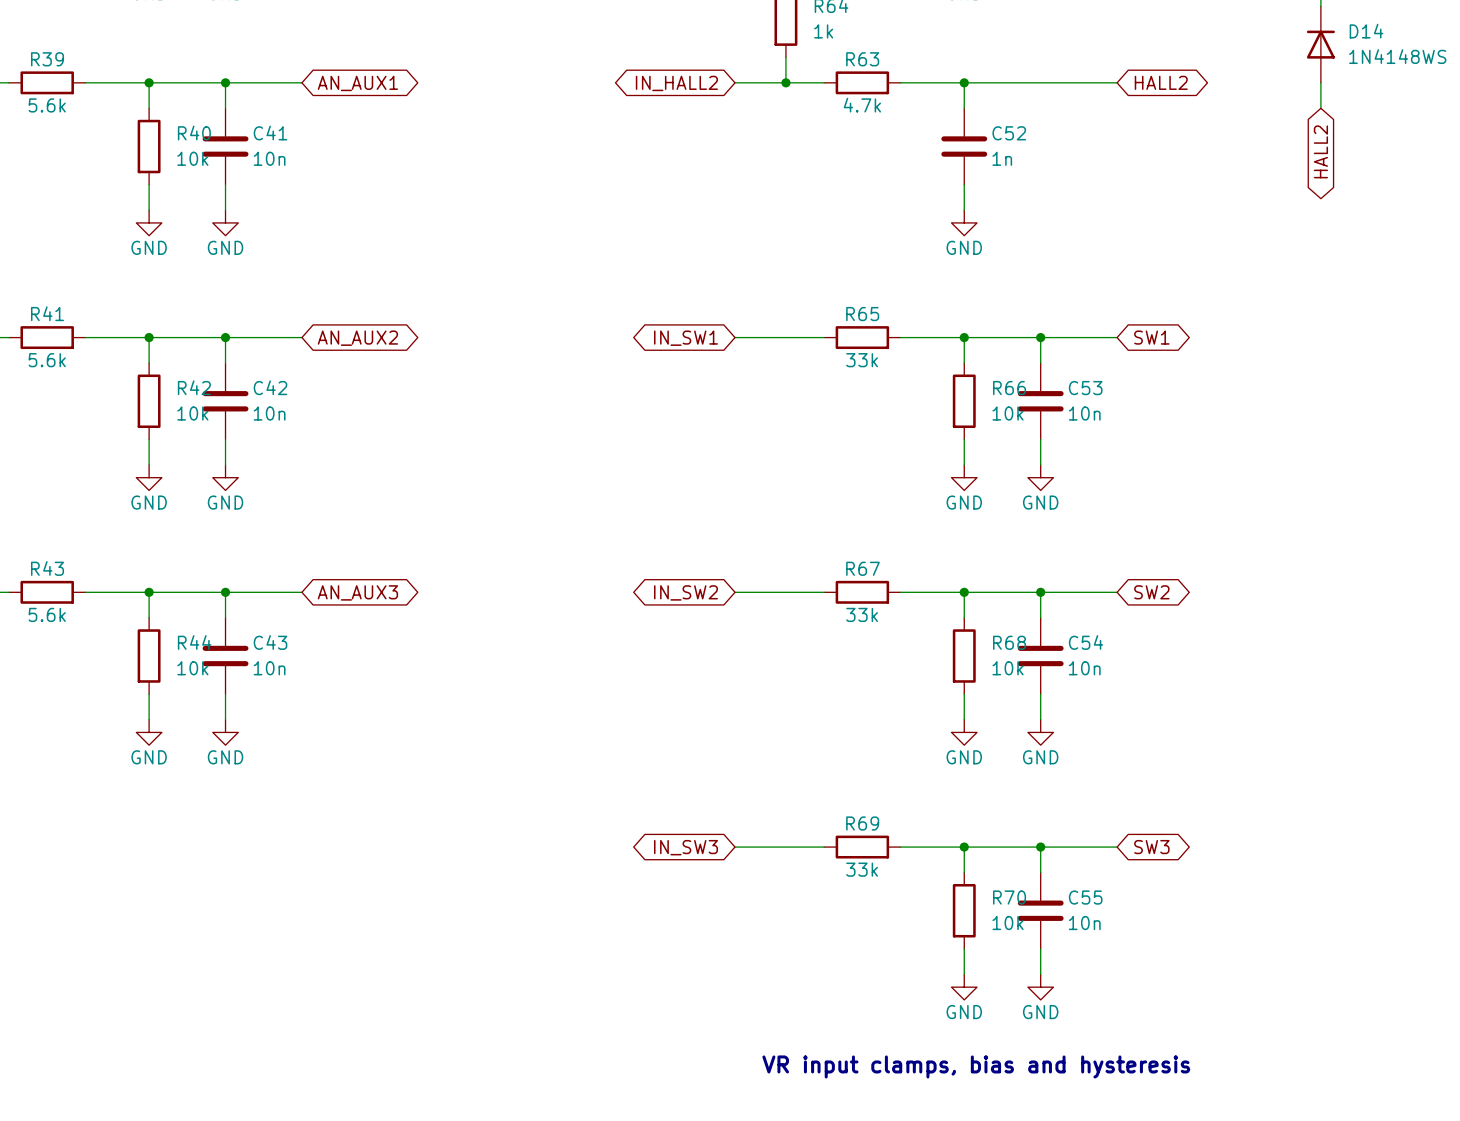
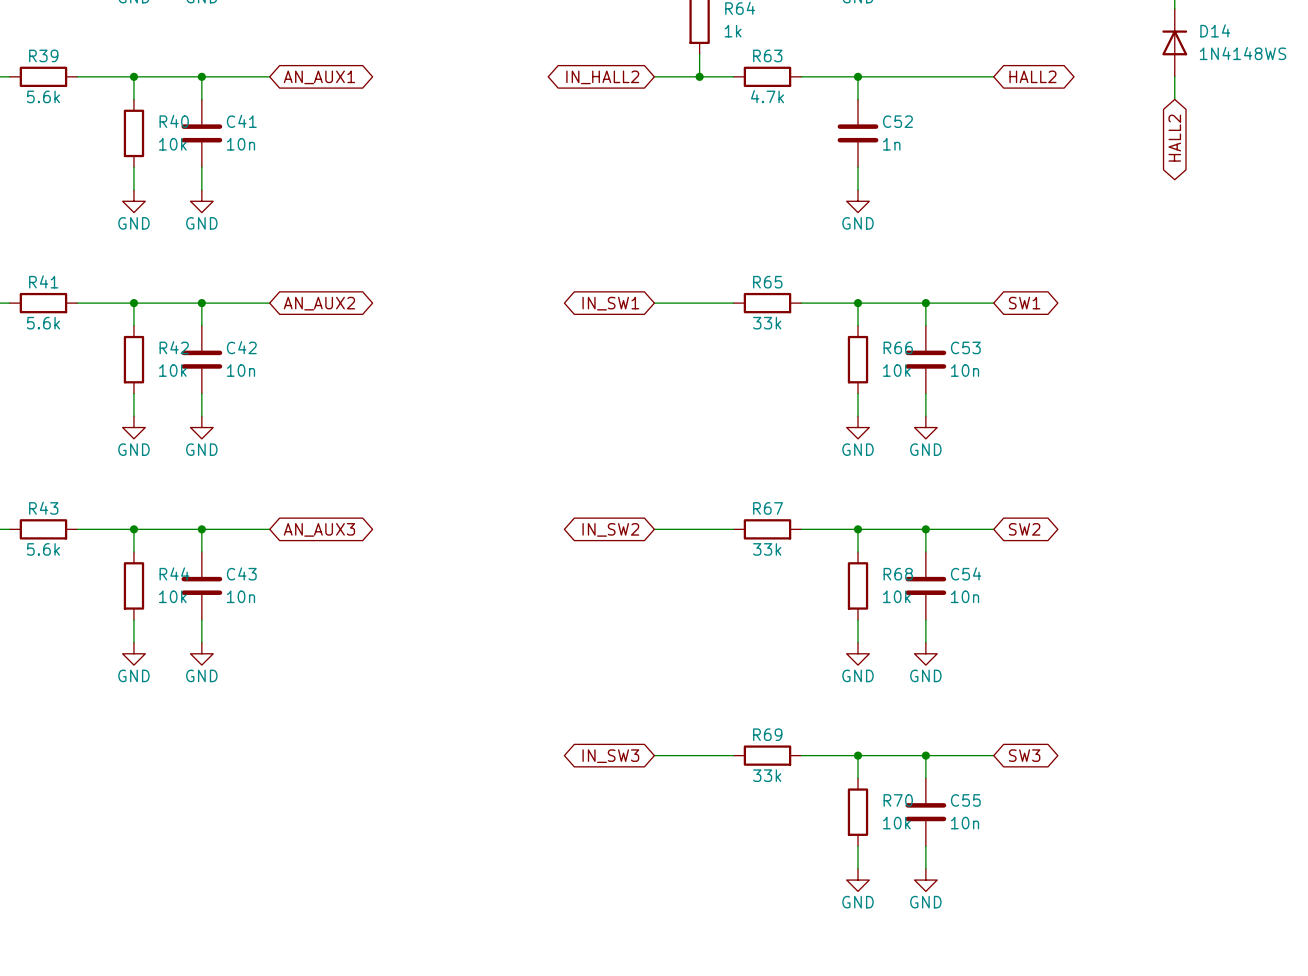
text: VR input clamps, bias and hysteresis (976, 1066) -> none

